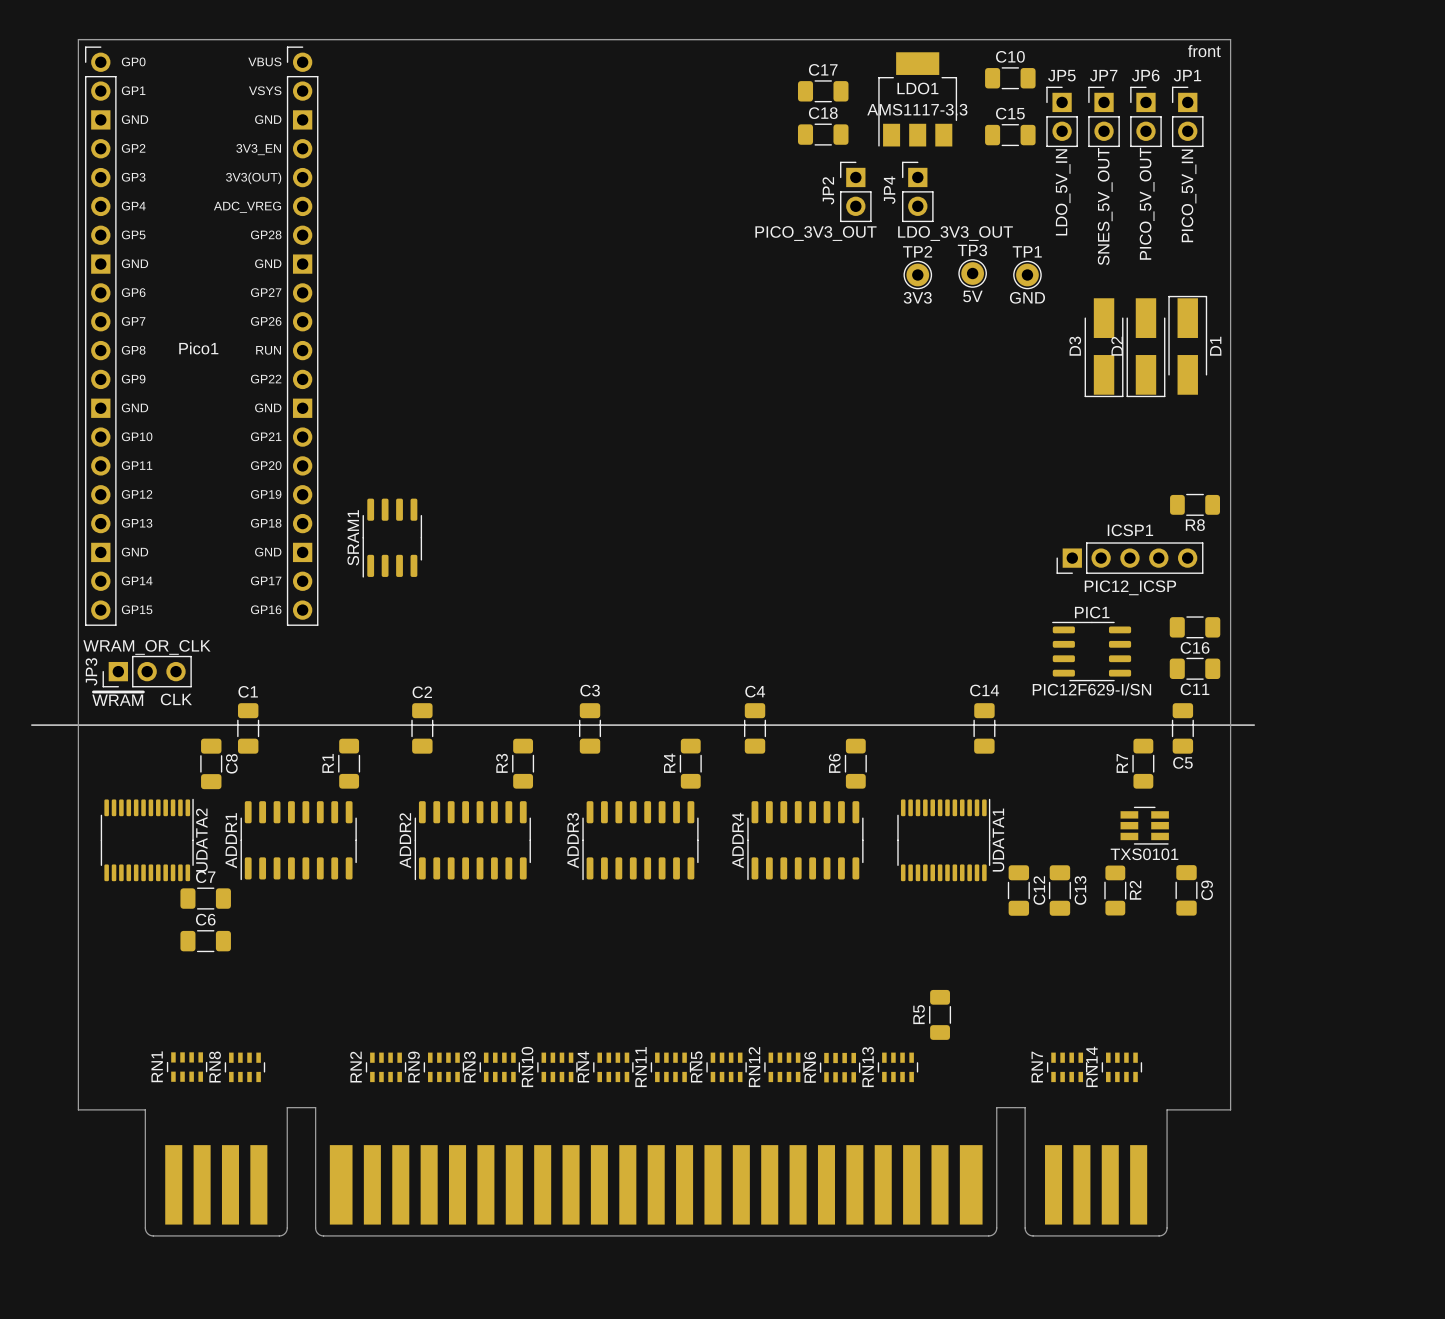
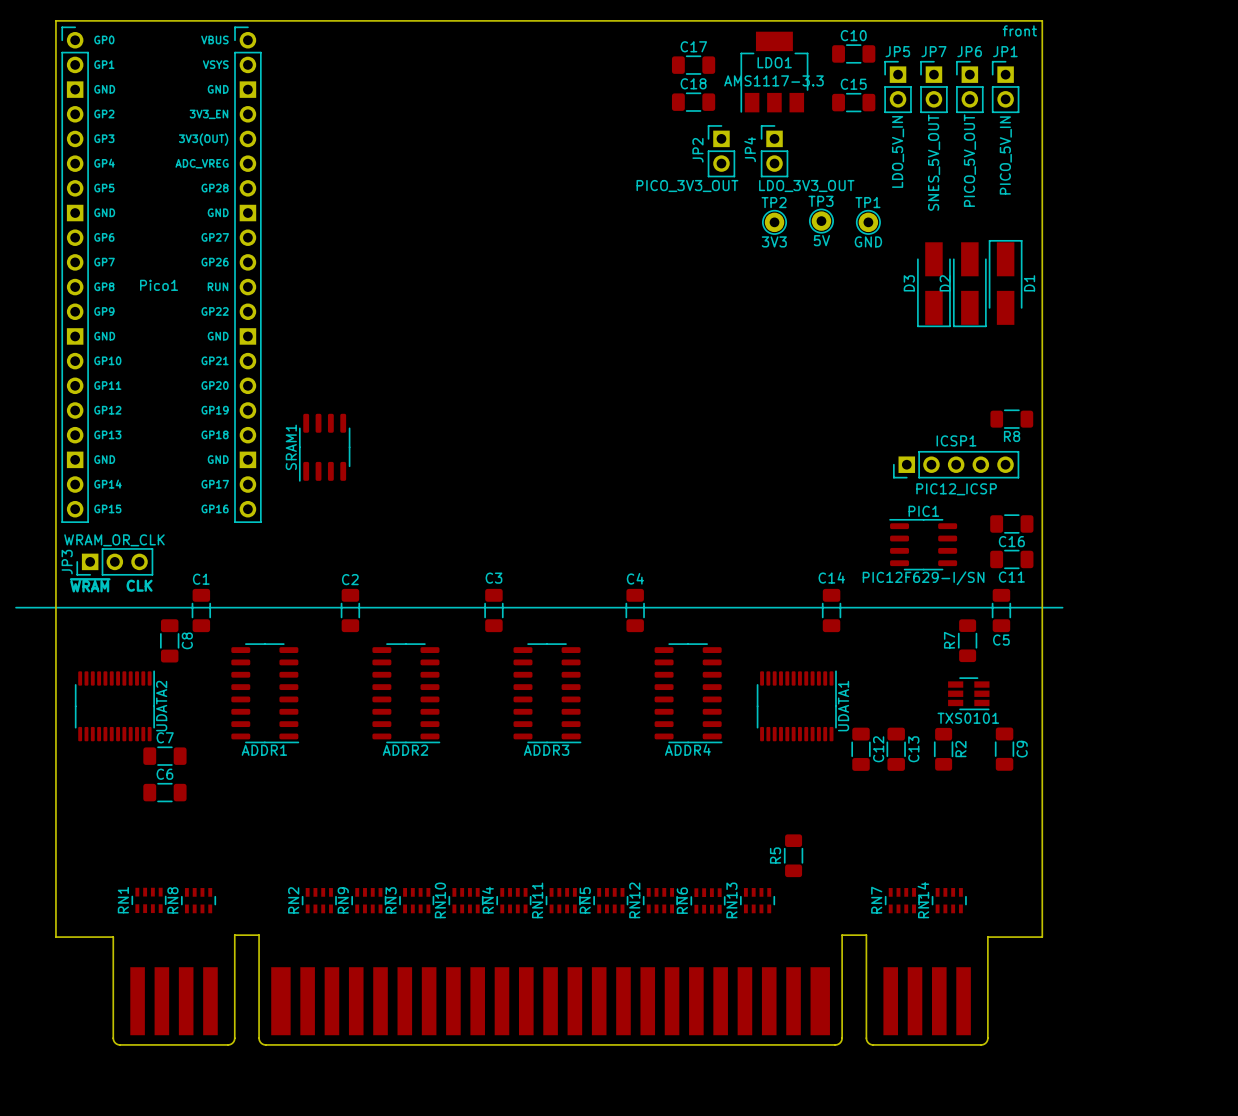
R1: (349, 763) -> none
R3: (523, 763) -> none
R4: (690, 763) -> none
R6: (855, 763) -> none
ADDR1 rotation: 0° (298, 840) -> 90° counterclockwise (265, 693)
ADDR2 rotation: 0° (472, 840) -> 90° counterclockwise (406, 693)
ADDR3 rotation: 0° (640, 840) -> 90° counterclockwise (547, 693)
ADDR4 rotation: 0° (805, 840) -> 90° counterclockwise (688, 693)

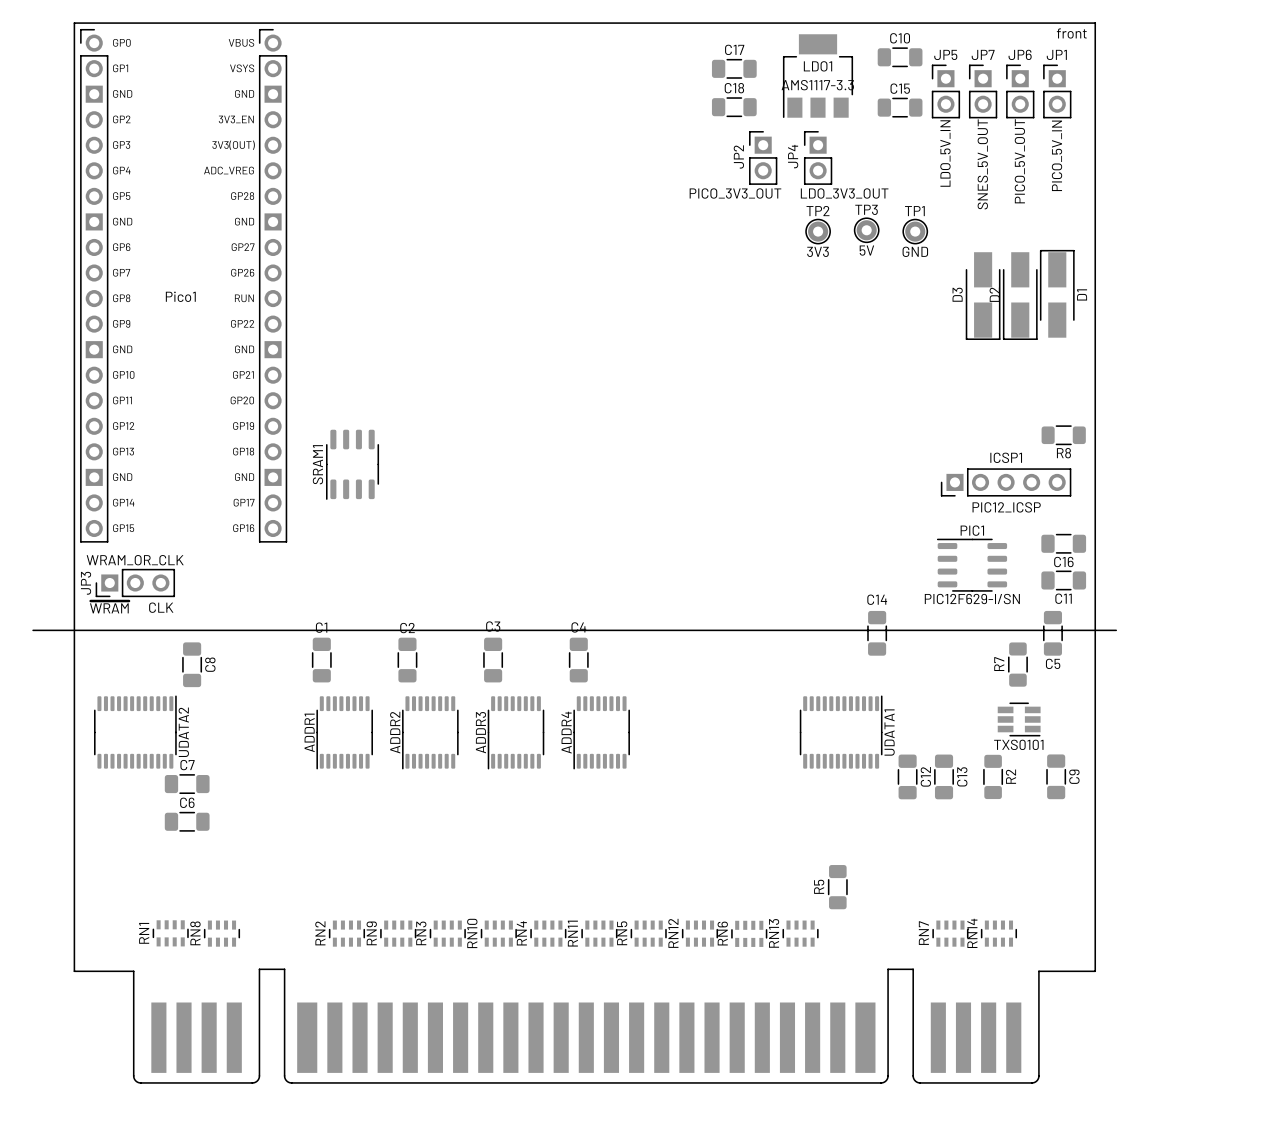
C1 position: (201, 610) -> (321, 660)
C2 position: (350, 610) -> (407, 660)
C3 position: (493, 610) -> (493, 660)
C4 position: (635, 610) -> (578, 660)
ADDR1 footprint: [231, 643, 299, 744] -> [316, 696, 373, 770]
ADDR2 footprint: [372, 643, 441, 744] -> [402, 696, 459, 770]
ADDR3 footprint: [513, 643, 582, 744] -> [487, 696, 545, 770]
ADDR4 footprint: [654, 643, 723, 744] -> [573, 696, 630, 770]
ADDR1 name position: ADDR1 (264, 750) -> ADDR1 (309, 732)
ADDR2 name position: ADDR2 (405, 750) -> ADDR2 (395, 732)
ADDR3 name position: ADDR3 (546, 750) -> ADDR3 (480, 732)
ADDR4 name position: ADDR4 (687, 750) -> ADDR4 (566, 732)

